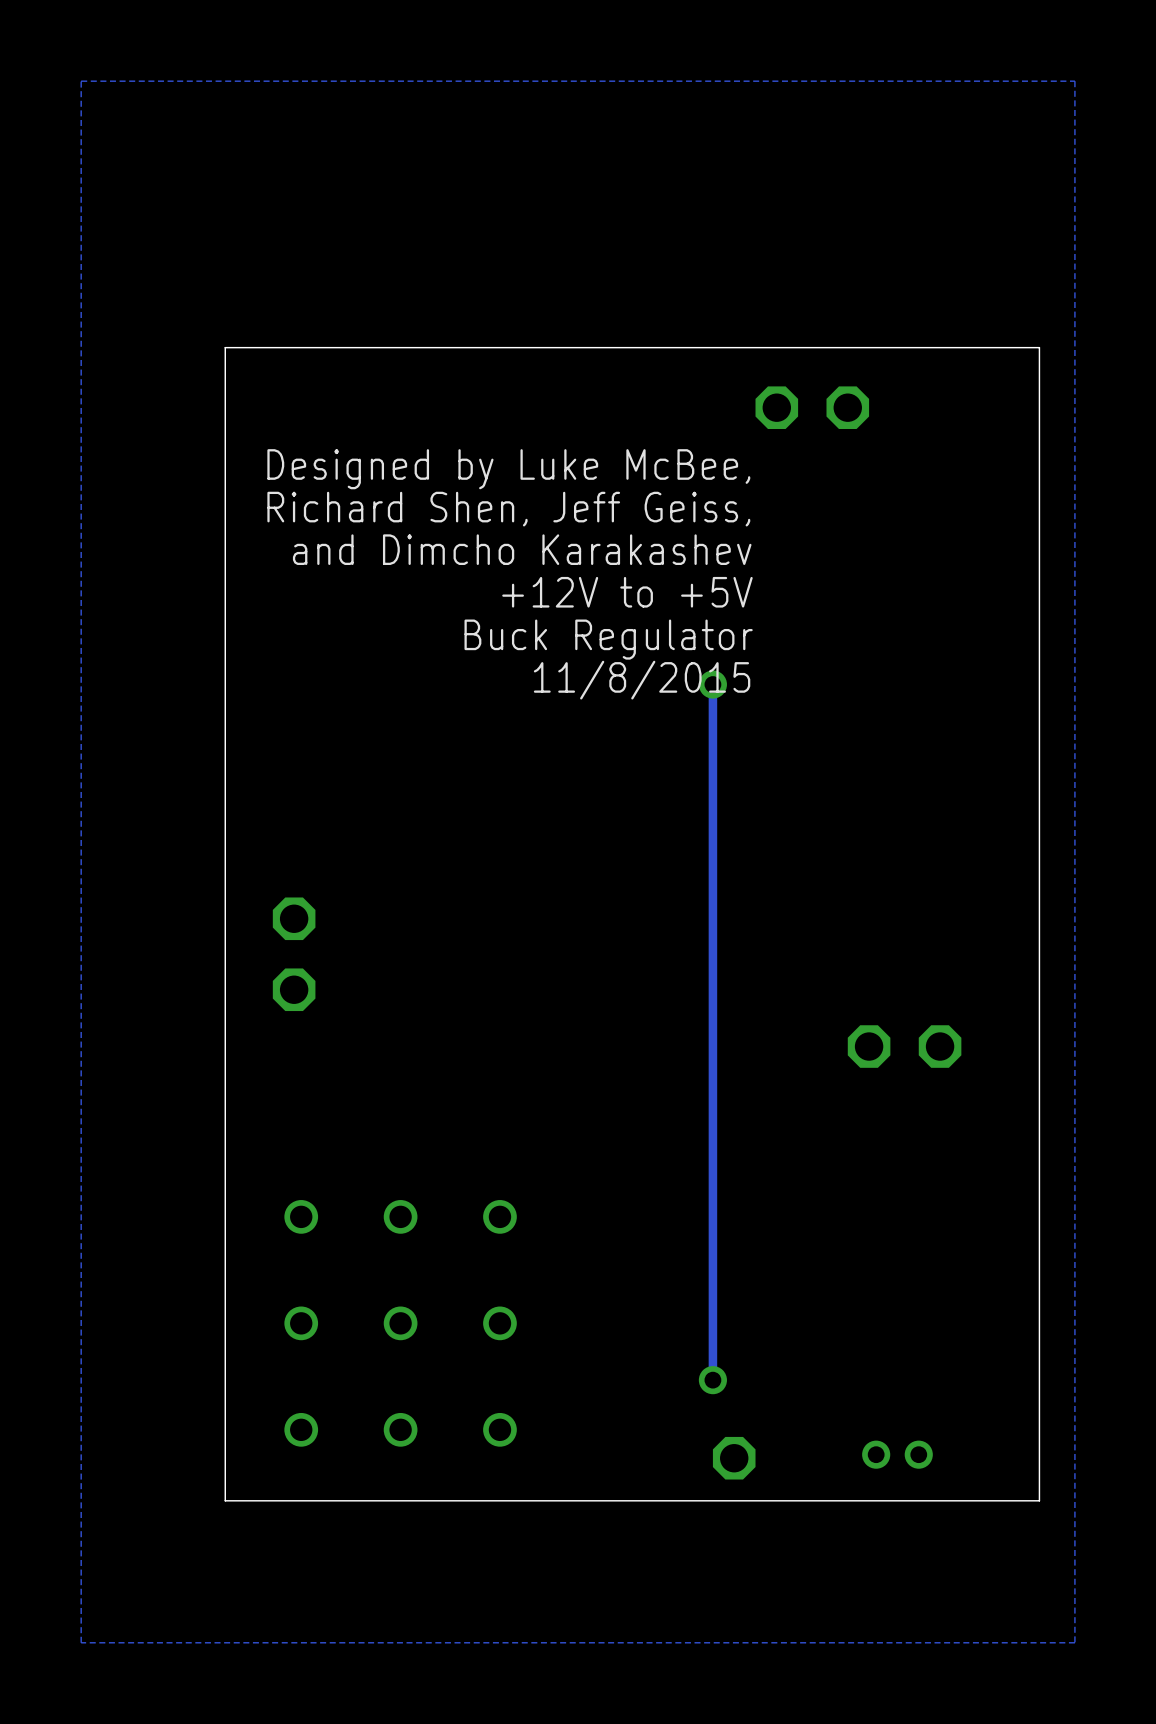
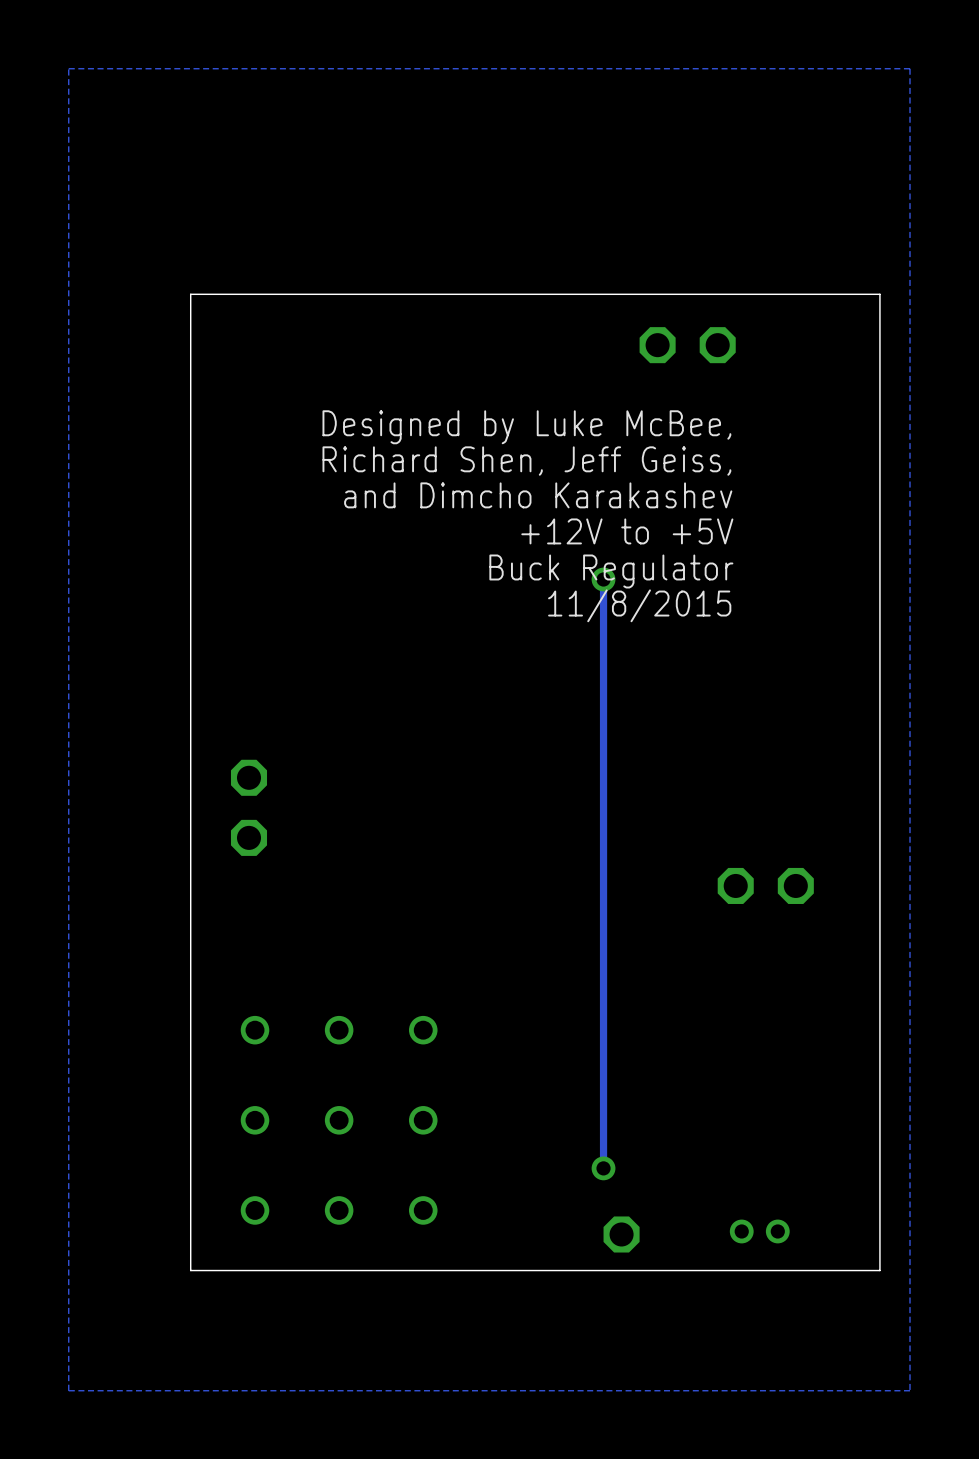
text position: Designed by Luke McBee, (508, 469) -> Designed by Luke McBee, (526, 427)
text position: Richard Shen, Jeff Geiss, (508, 509) -> Richard Shen, Jeff Geiss, (526, 461)
text position: and Dimcho Karakashev (522, 549) -> and Dimcho Karakashev (538, 495)
text position: +12V to +5V (627, 592) -> +12V to +5V (627, 531)
text position: Buck Regulator (608, 639) -> Buck Regulator (611, 571)
text position: 11/8/2015 (642, 680) -> 11/8/2015 (639, 605)

